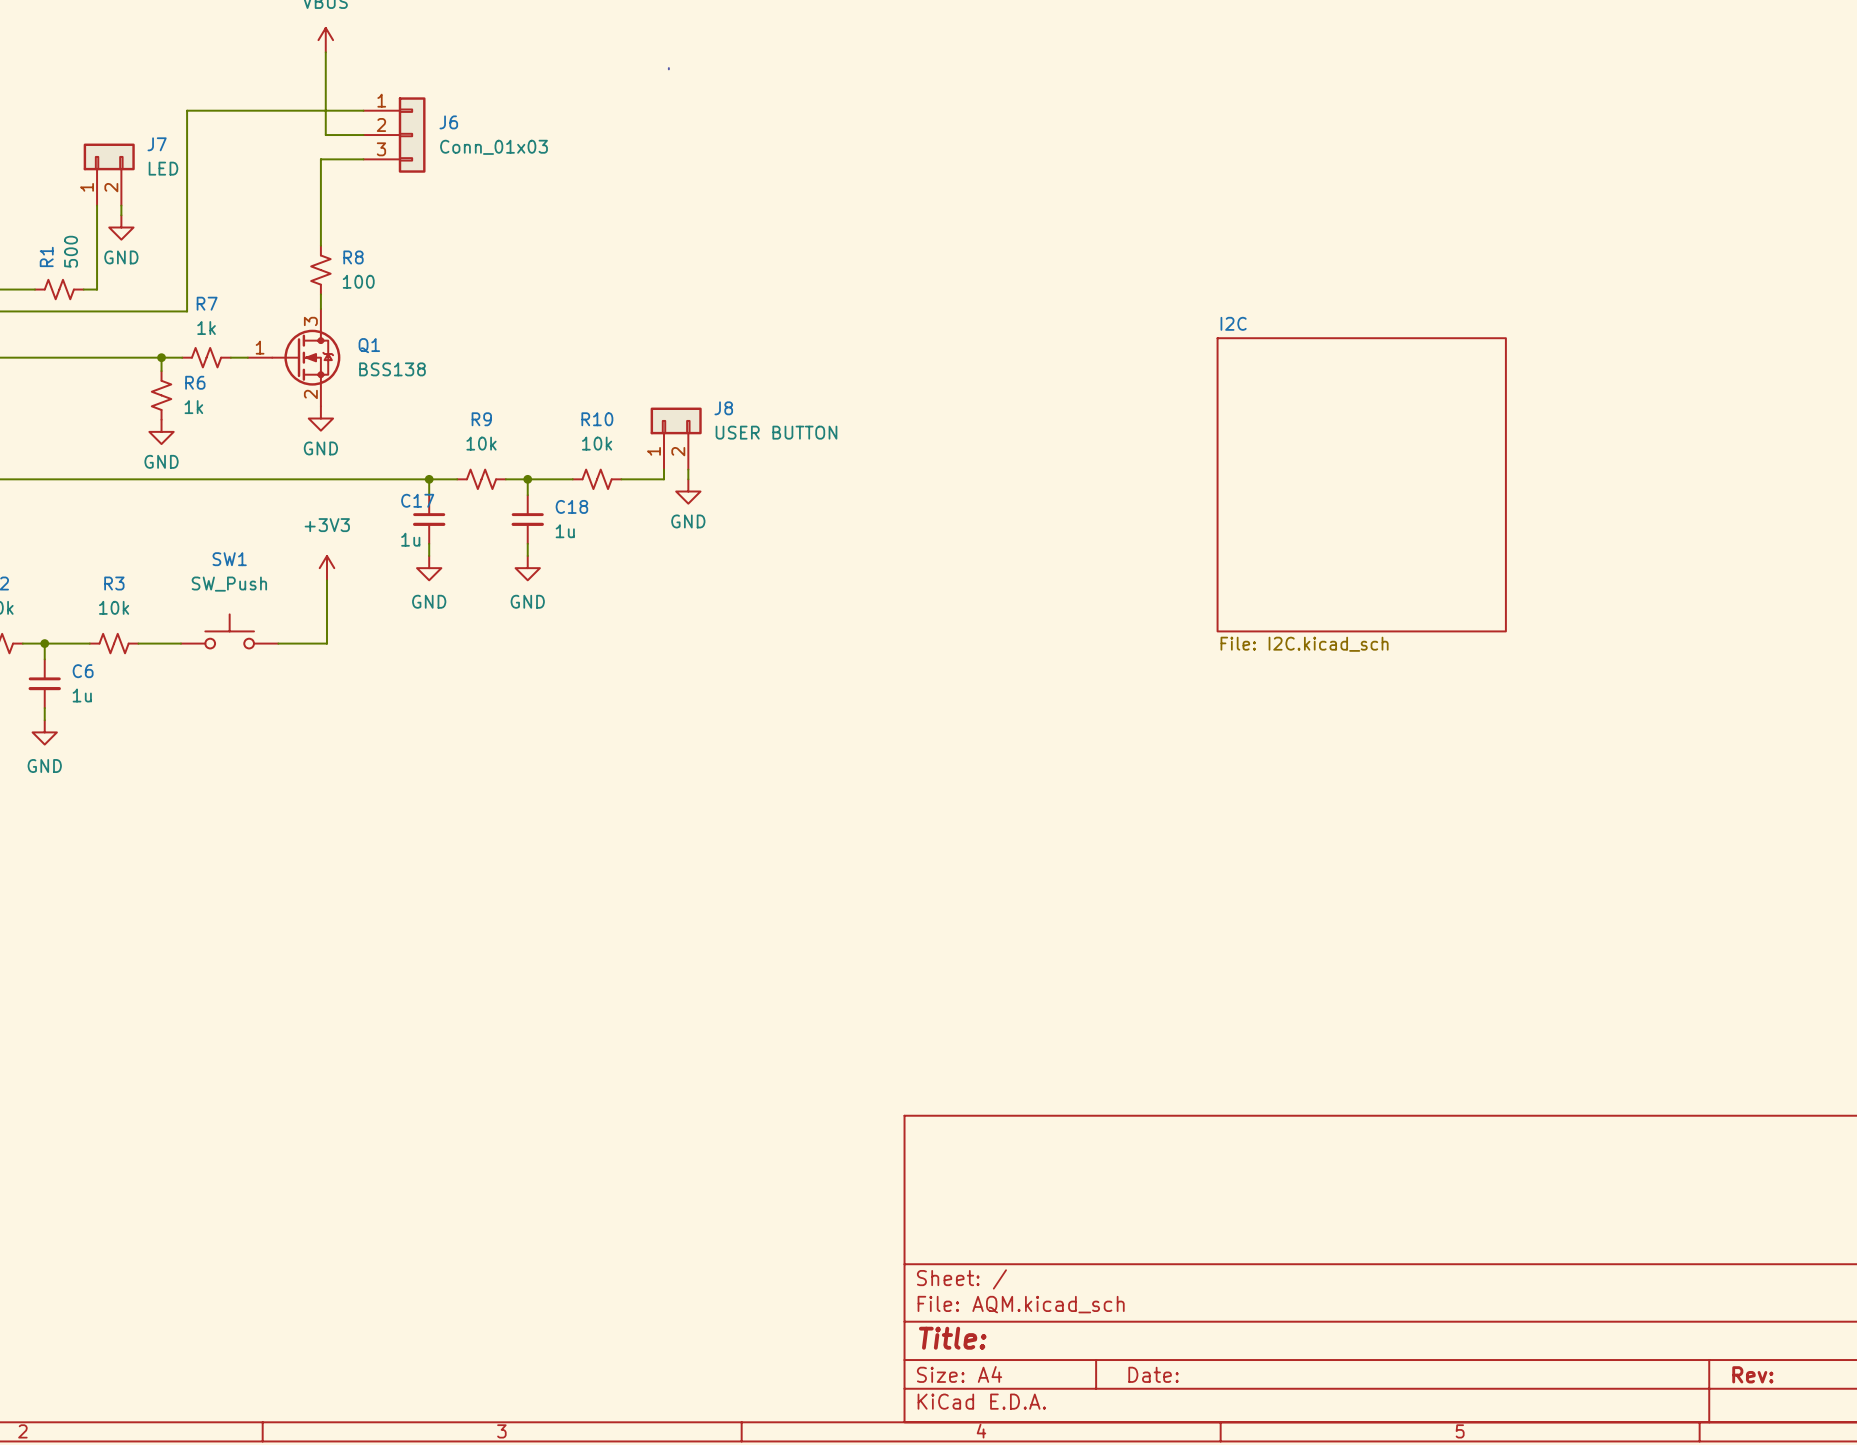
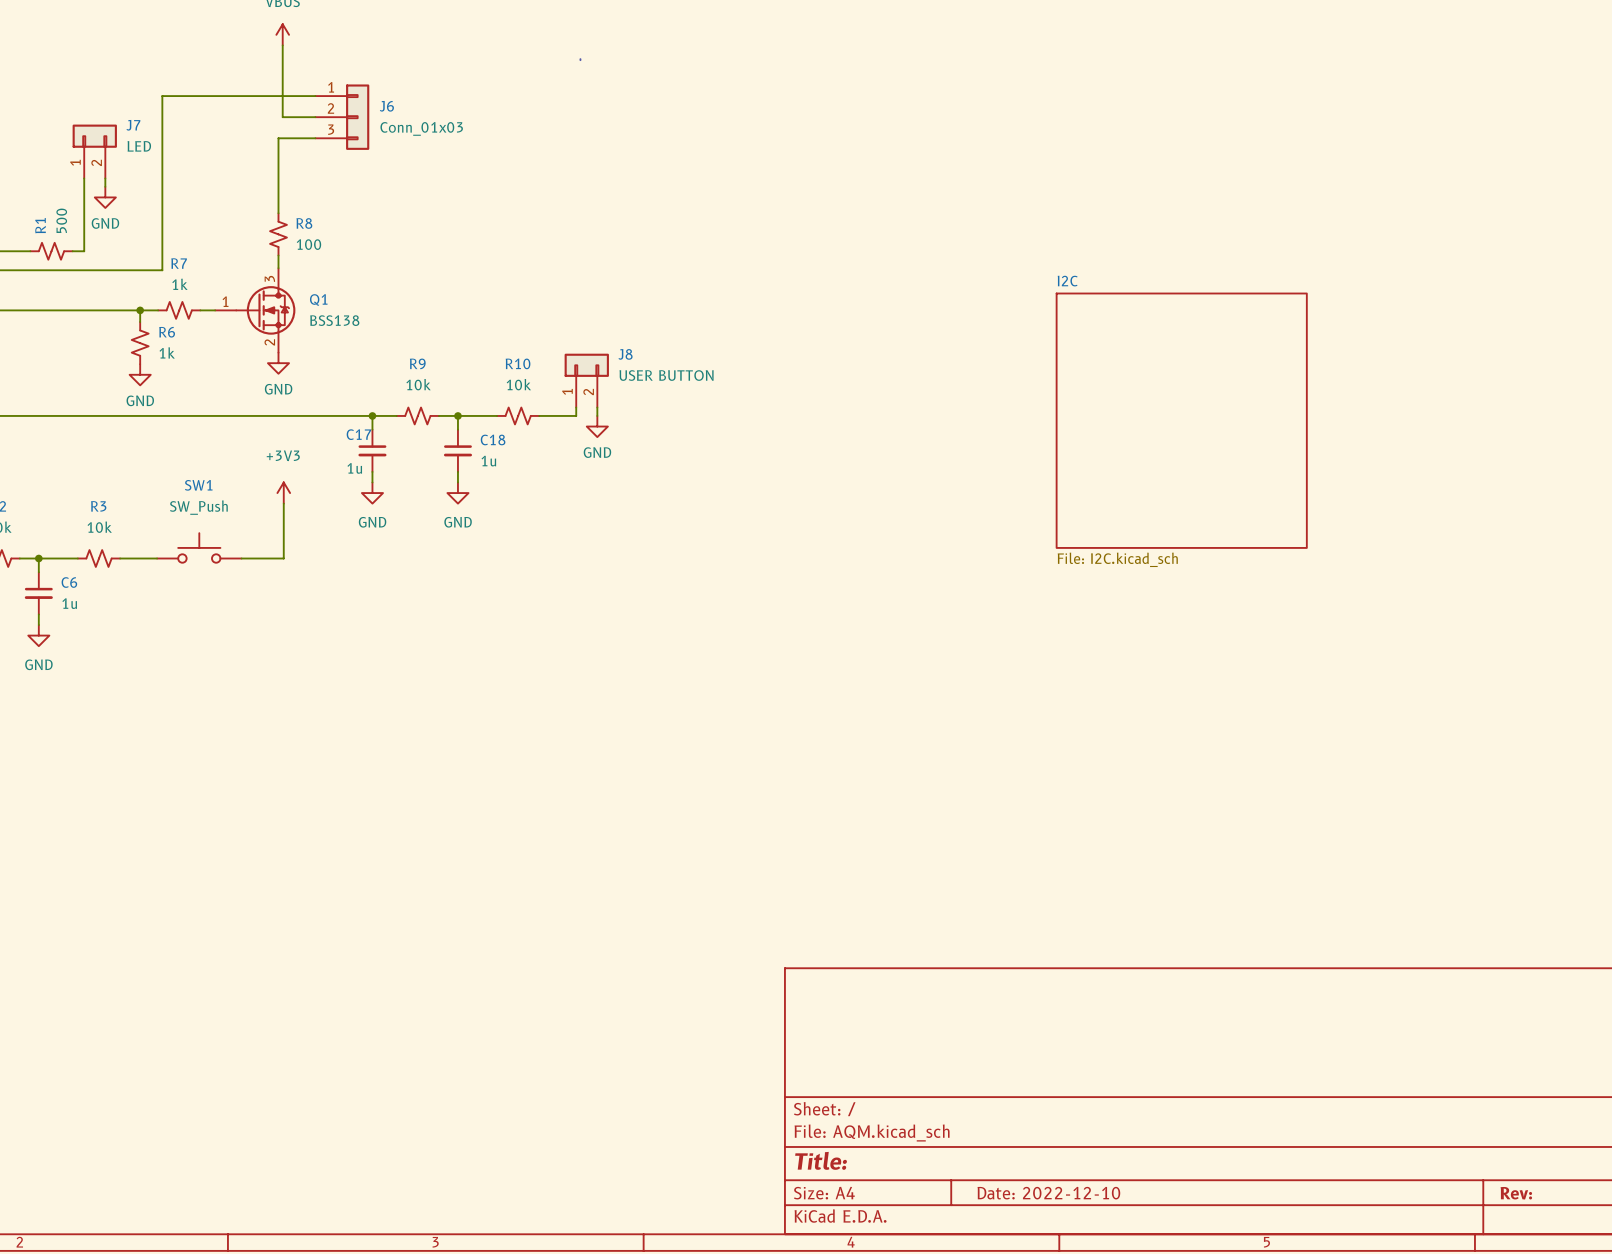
title block: Date: (1153, 1374) -> Date: 2022-12-10 (1048, 1193)

